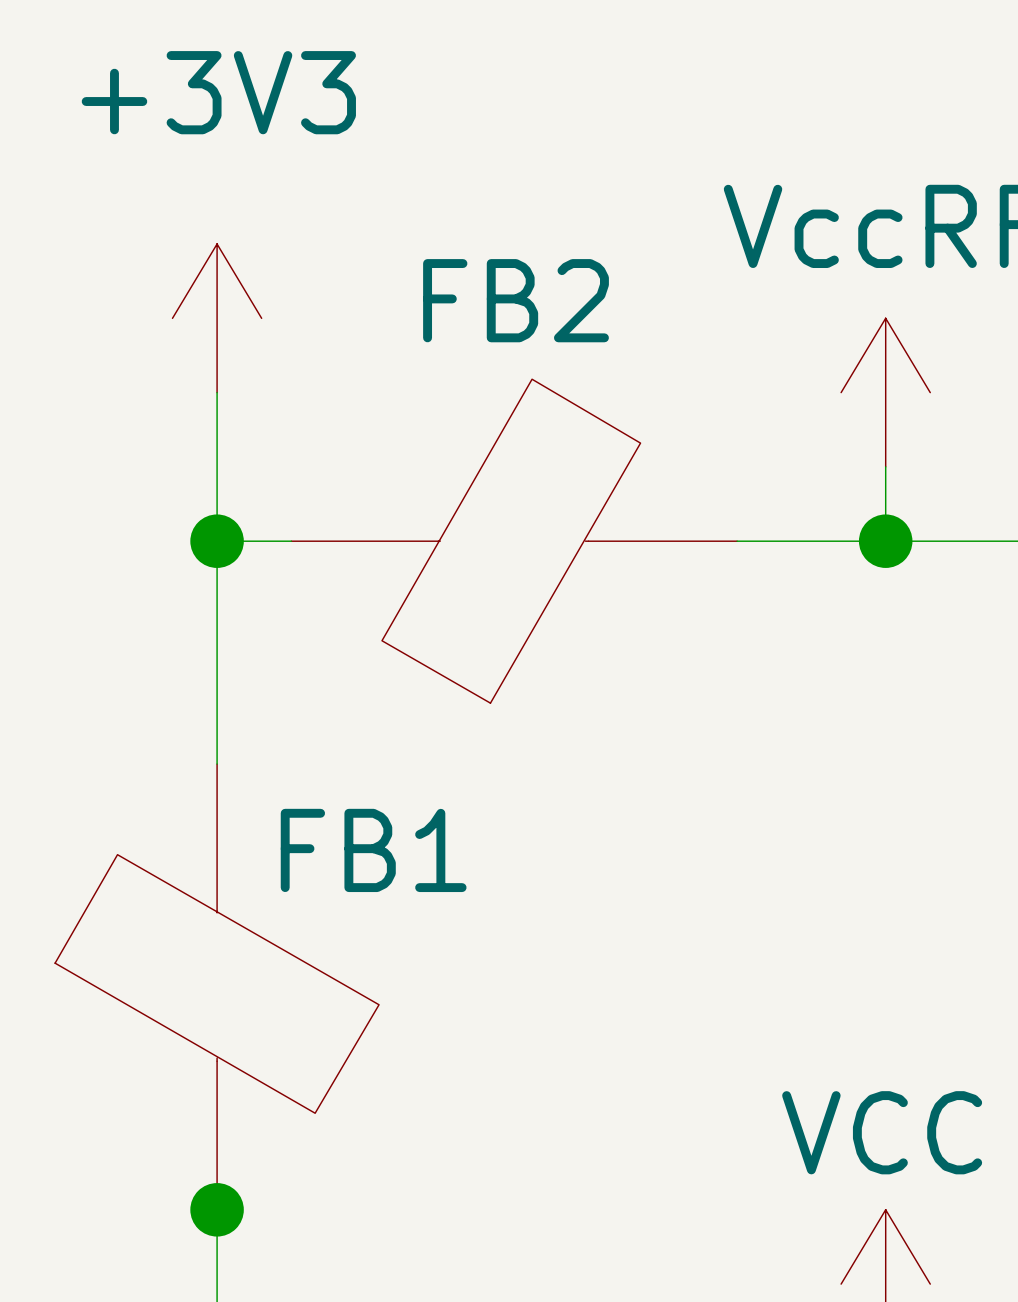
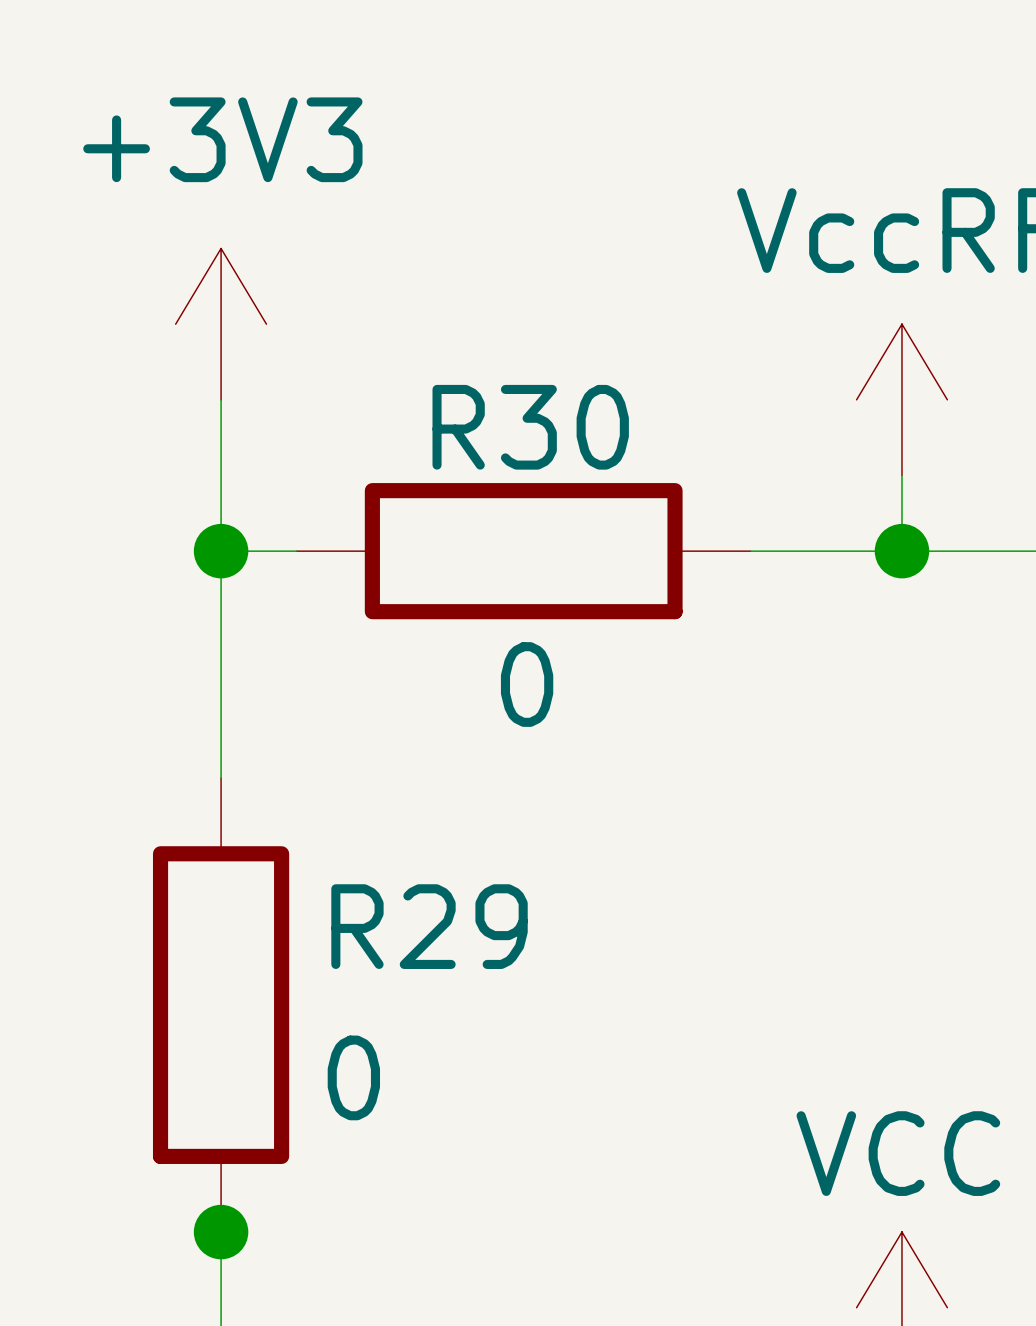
power symbol text position: +3V3 (218, 92) -> +3V3 (222, 139)
FB2: (514, 541) -> none
R30: none -> 0 (523, 551)
FB1: (217, 986) -> none
R29: none -> 0 (221, 1005)

